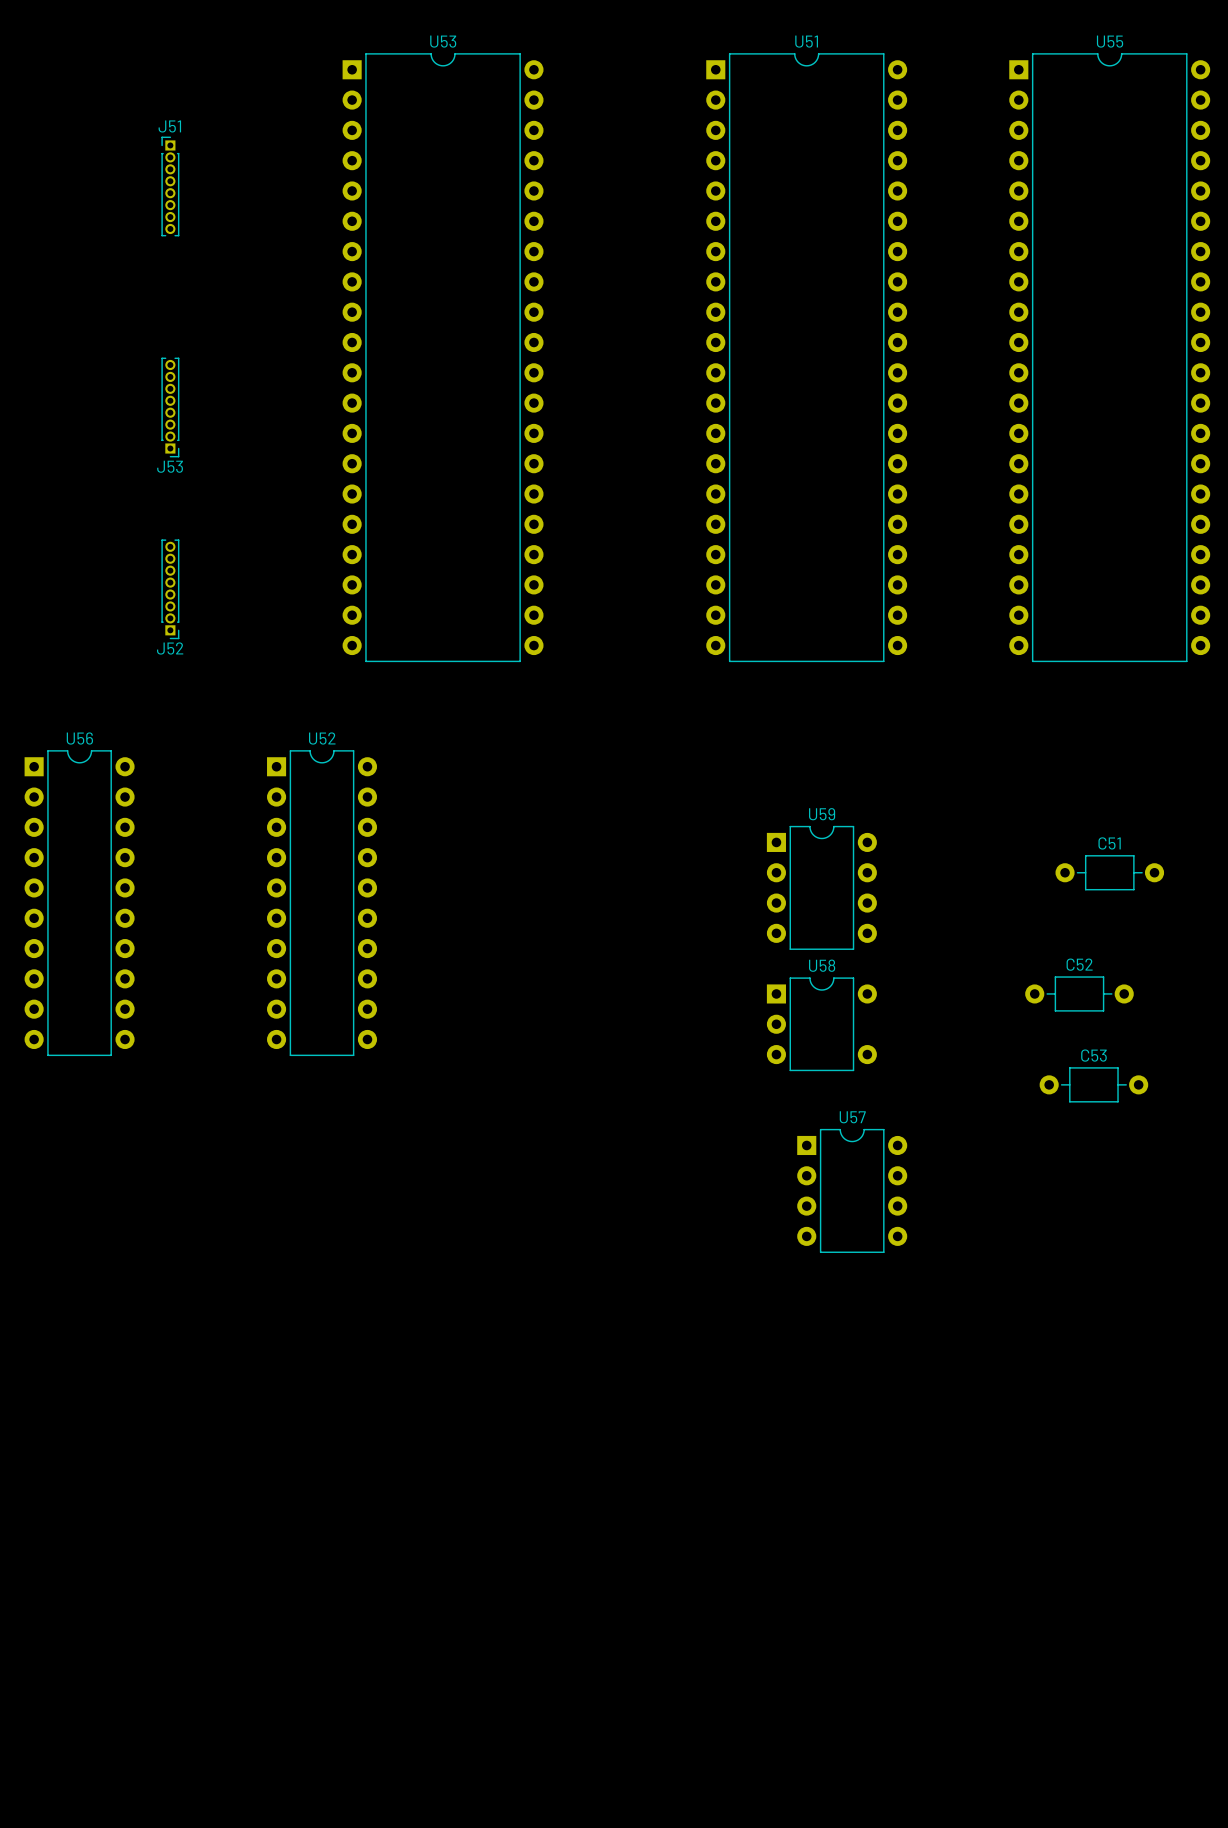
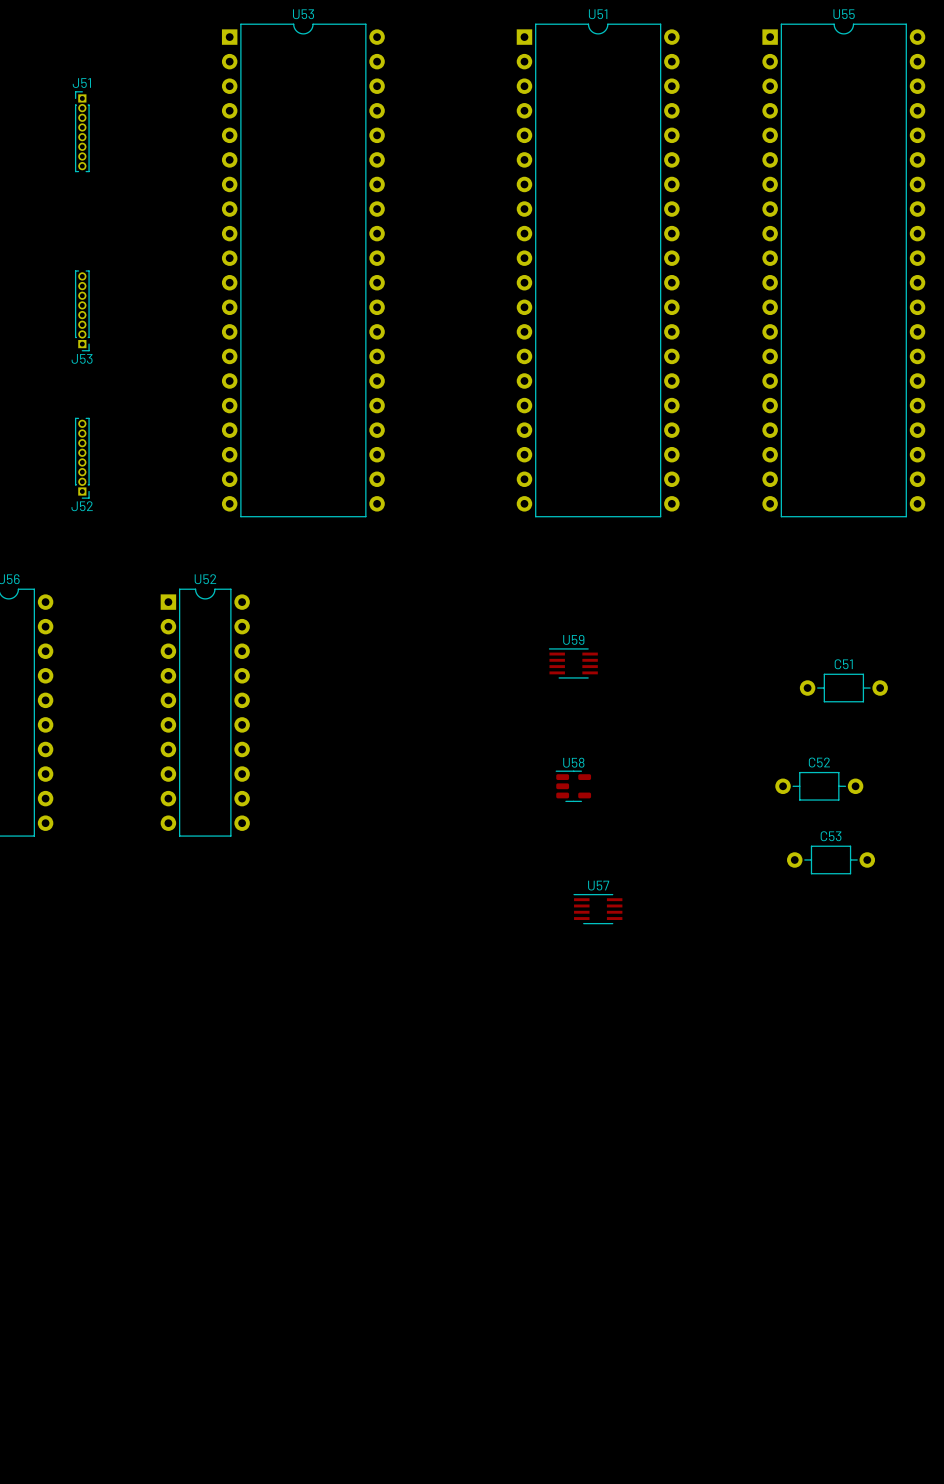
U59 name position: U59 (822, 814) -> U59 (573, 639)
U59 footprint: [766, 825, 877, 950] -> [548, 648, 598, 679]
U58 name position: U58 (822, 965) -> U58 (573, 762)
U58 footprint: [766, 977, 877, 1072] -> [555, 770, 592, 802]
U57 name position: U57 (852, 1117) -> U57 (598, 885)
U57 footprint: [797, 1128, 908, 1253] -> [573, 894, 623, 925]

